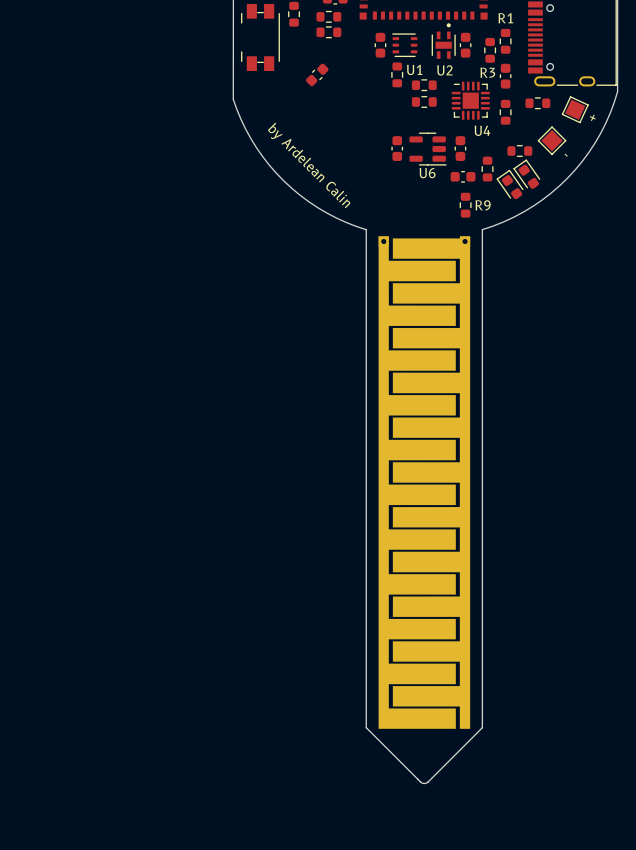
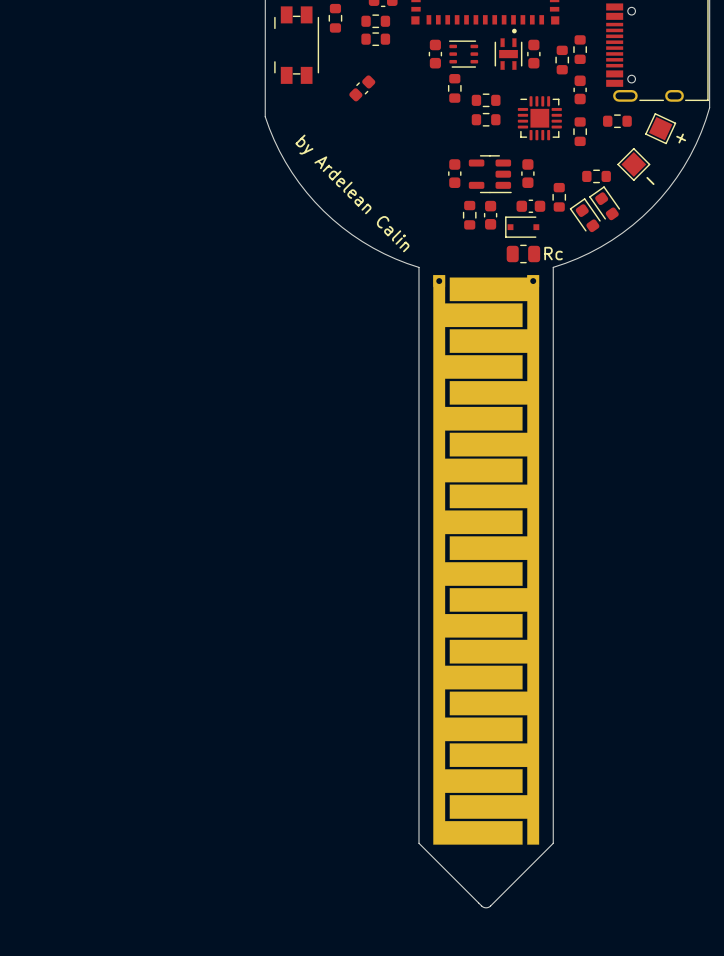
R1 name: R1 (505, 18) -> none
U1 name: U1 (414, 69) -> none
U2 name: U2 (444, 70) -> none
R3 name: R3 (487, 72) -> none
U4 name: U4 (482, 130) -> none
U6 name: U6 (427, 173) -> none
part: none -> (469, 215)
part: none -> (490, 215)
part: none -> (522, 227)
R9: (465, 205) -> none
text: none -> Rc (553, 253)
part: none -> (523, 254)

